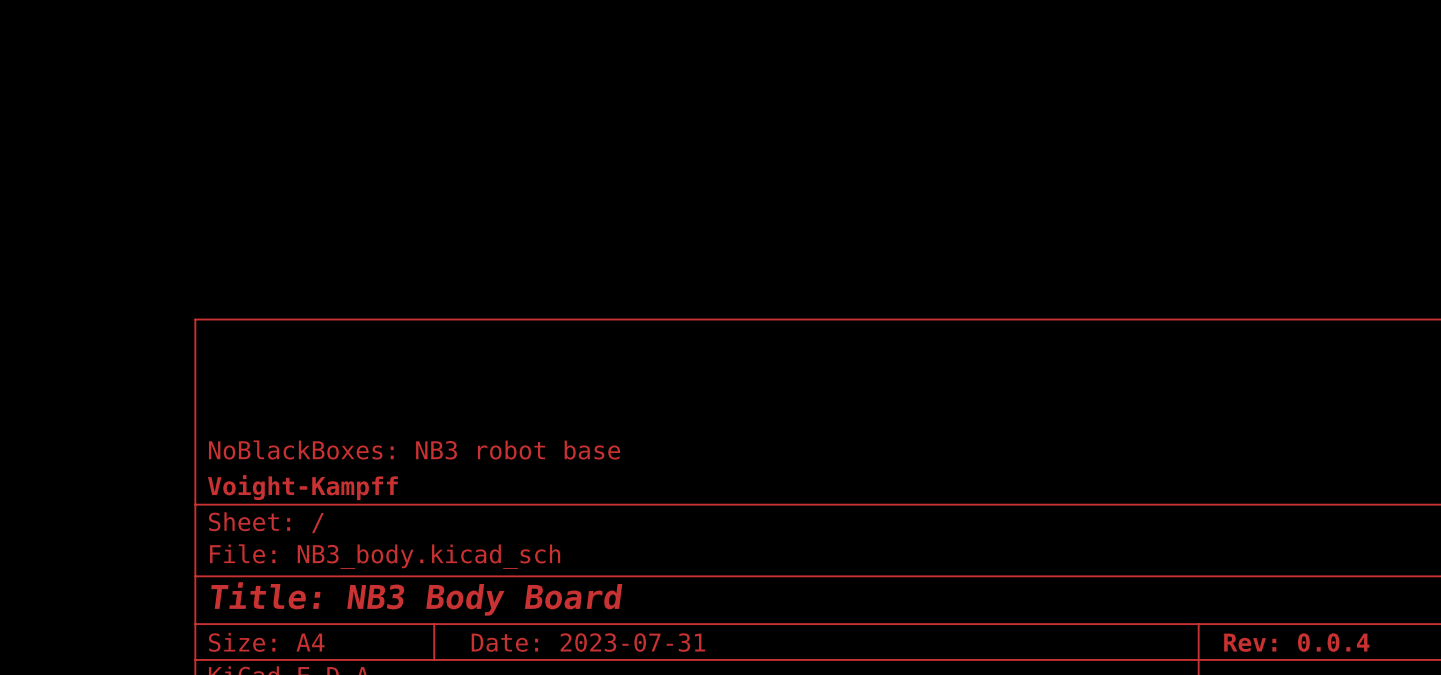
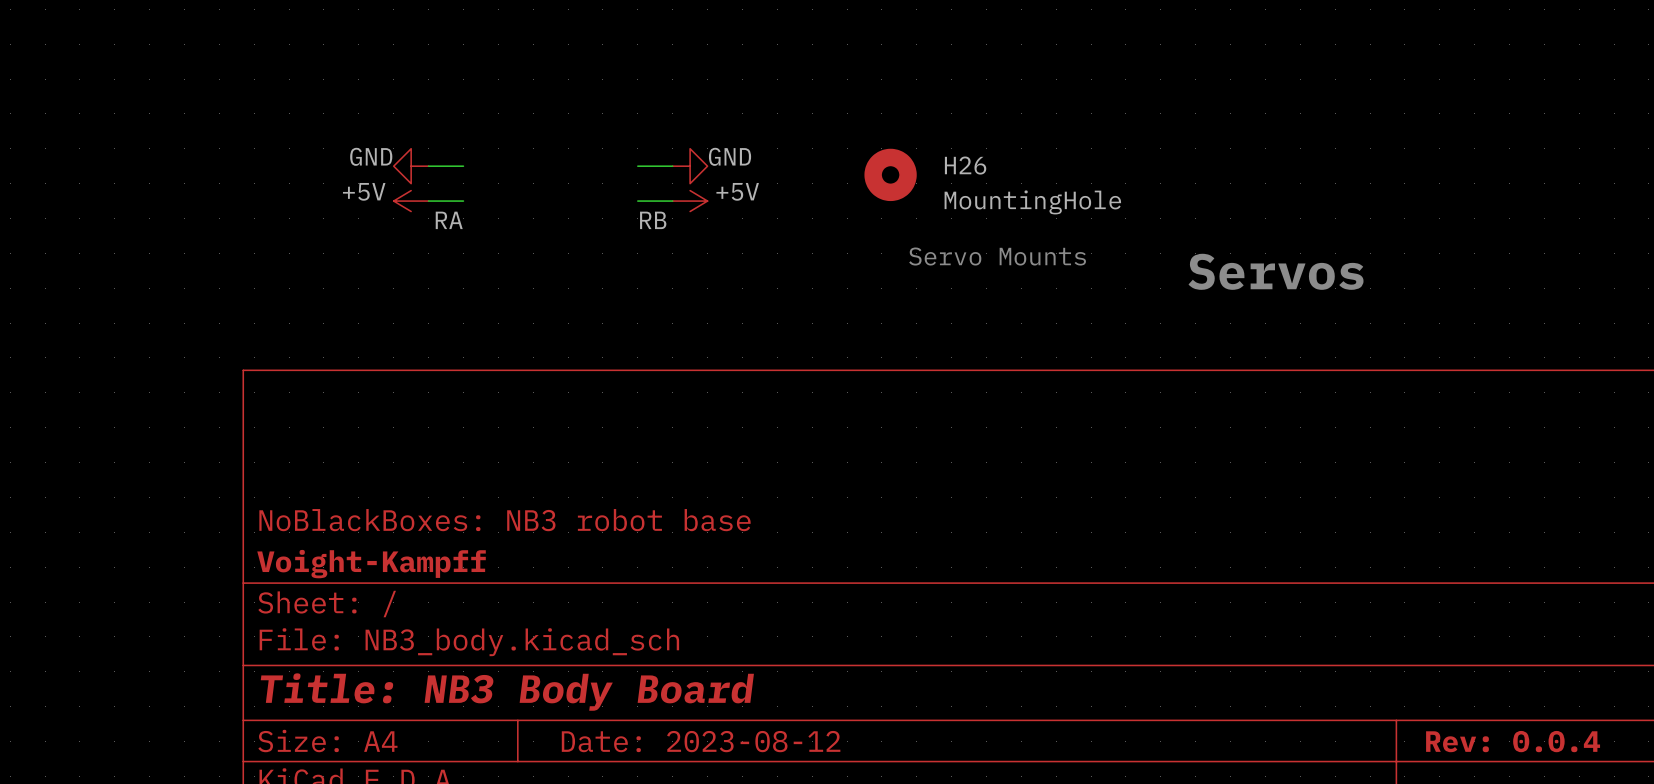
power symbol: none -> GND (411, 166)
wire: none -> (428, 166) (463, 166)
wire: none -> (637, 166) (672, 166)
power symbol: none -> GND (690, 166)
H26: none -> MountingHole (890, 174)
power symbol: none -> +5V (411, 201)
wire: none -> (428, 201) (463, 201)
wire: none -> (637, 201) (672, 201)
power symbol: none -> +5V (690, 201)
label: none -> RA (449, 220)
label: none -> RB (653, 220)
text: none -> Servo Mounts (997, 256)
text: none -> Servos (1276, 271)
title block: Date: 2023-07-31 (588, 642) -> Date: 2023-08-12 (701, 741)

